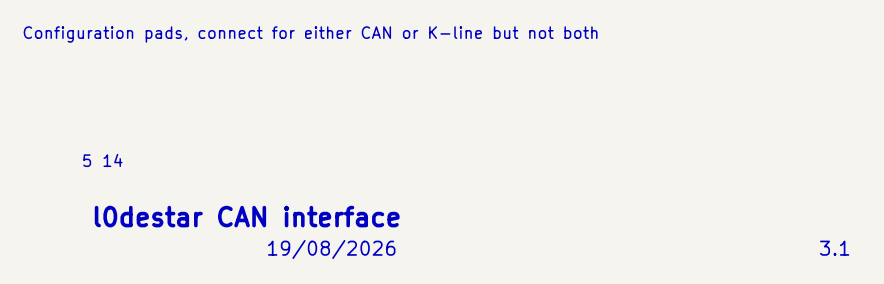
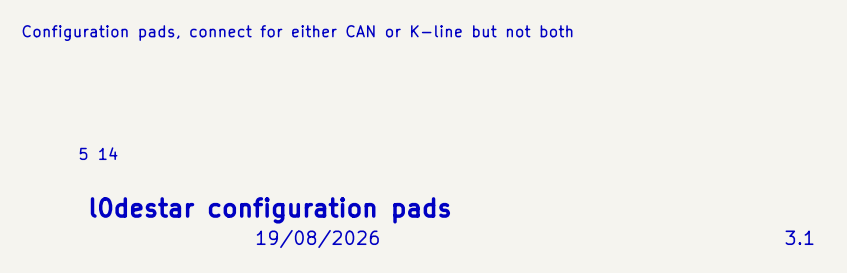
text: l0destar CAN interface (247, 216) -> l0destar configuration pads (270, 210)

